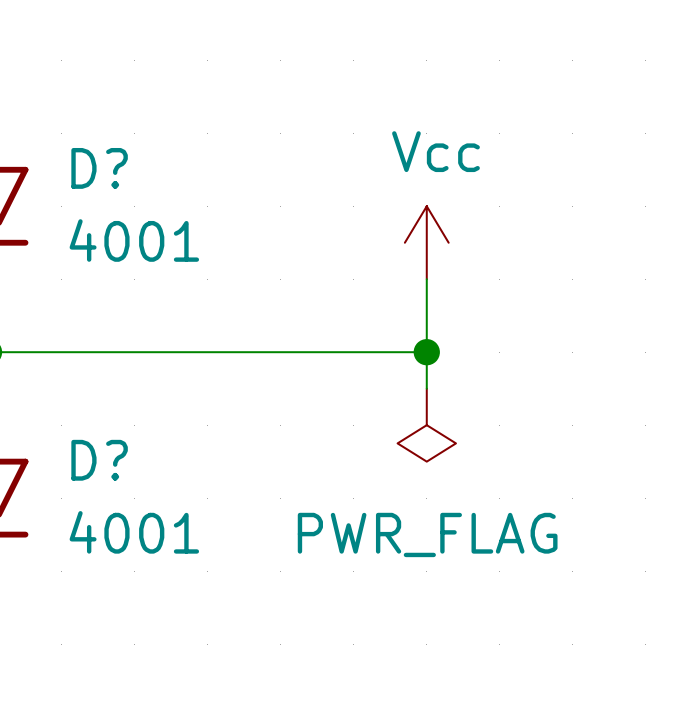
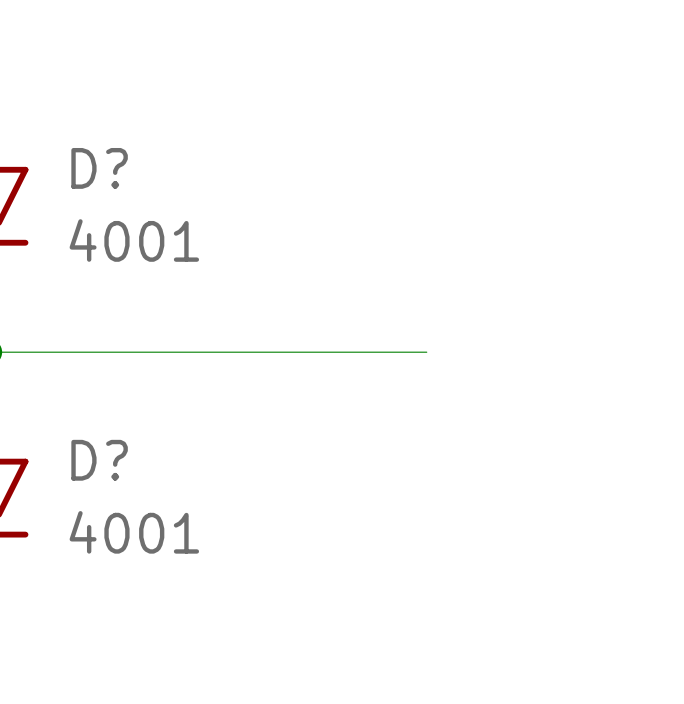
power symbol: Vcc (426, 242) -> none
wire: (426, 279) (426, 388) -> none
junction: (426, 352) -> none
power symbol: PWR_FLAG (426, 425) -> none

